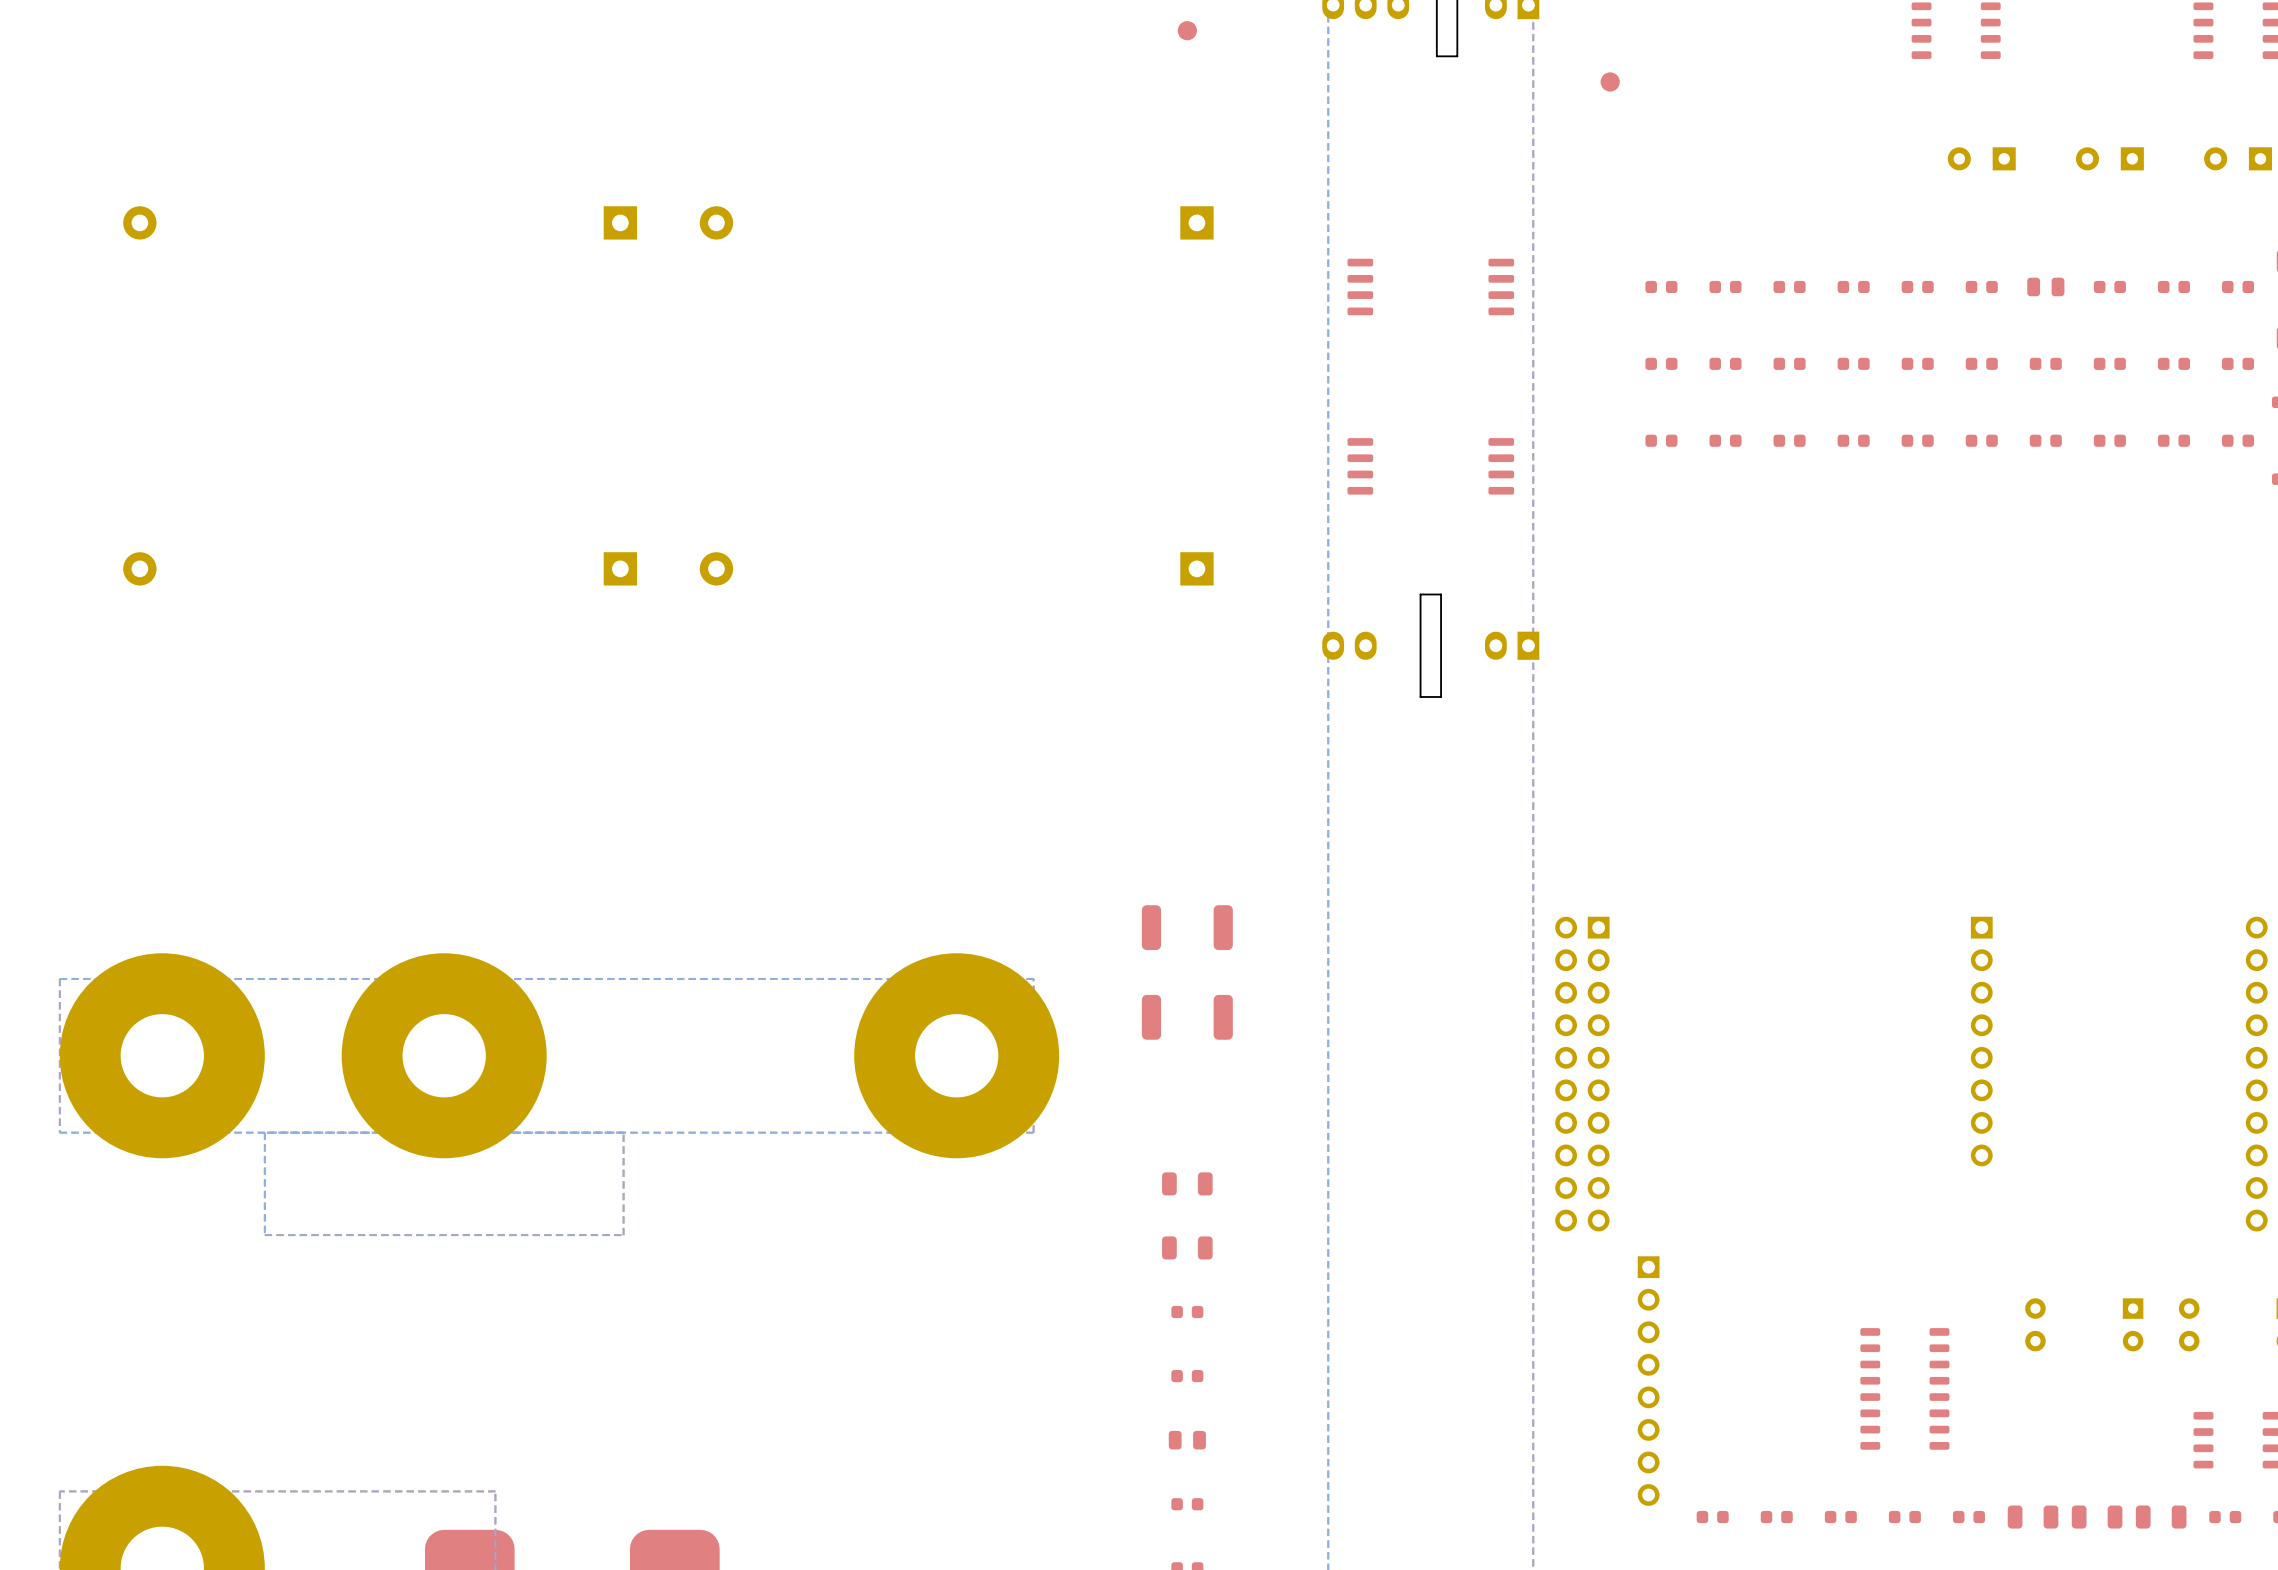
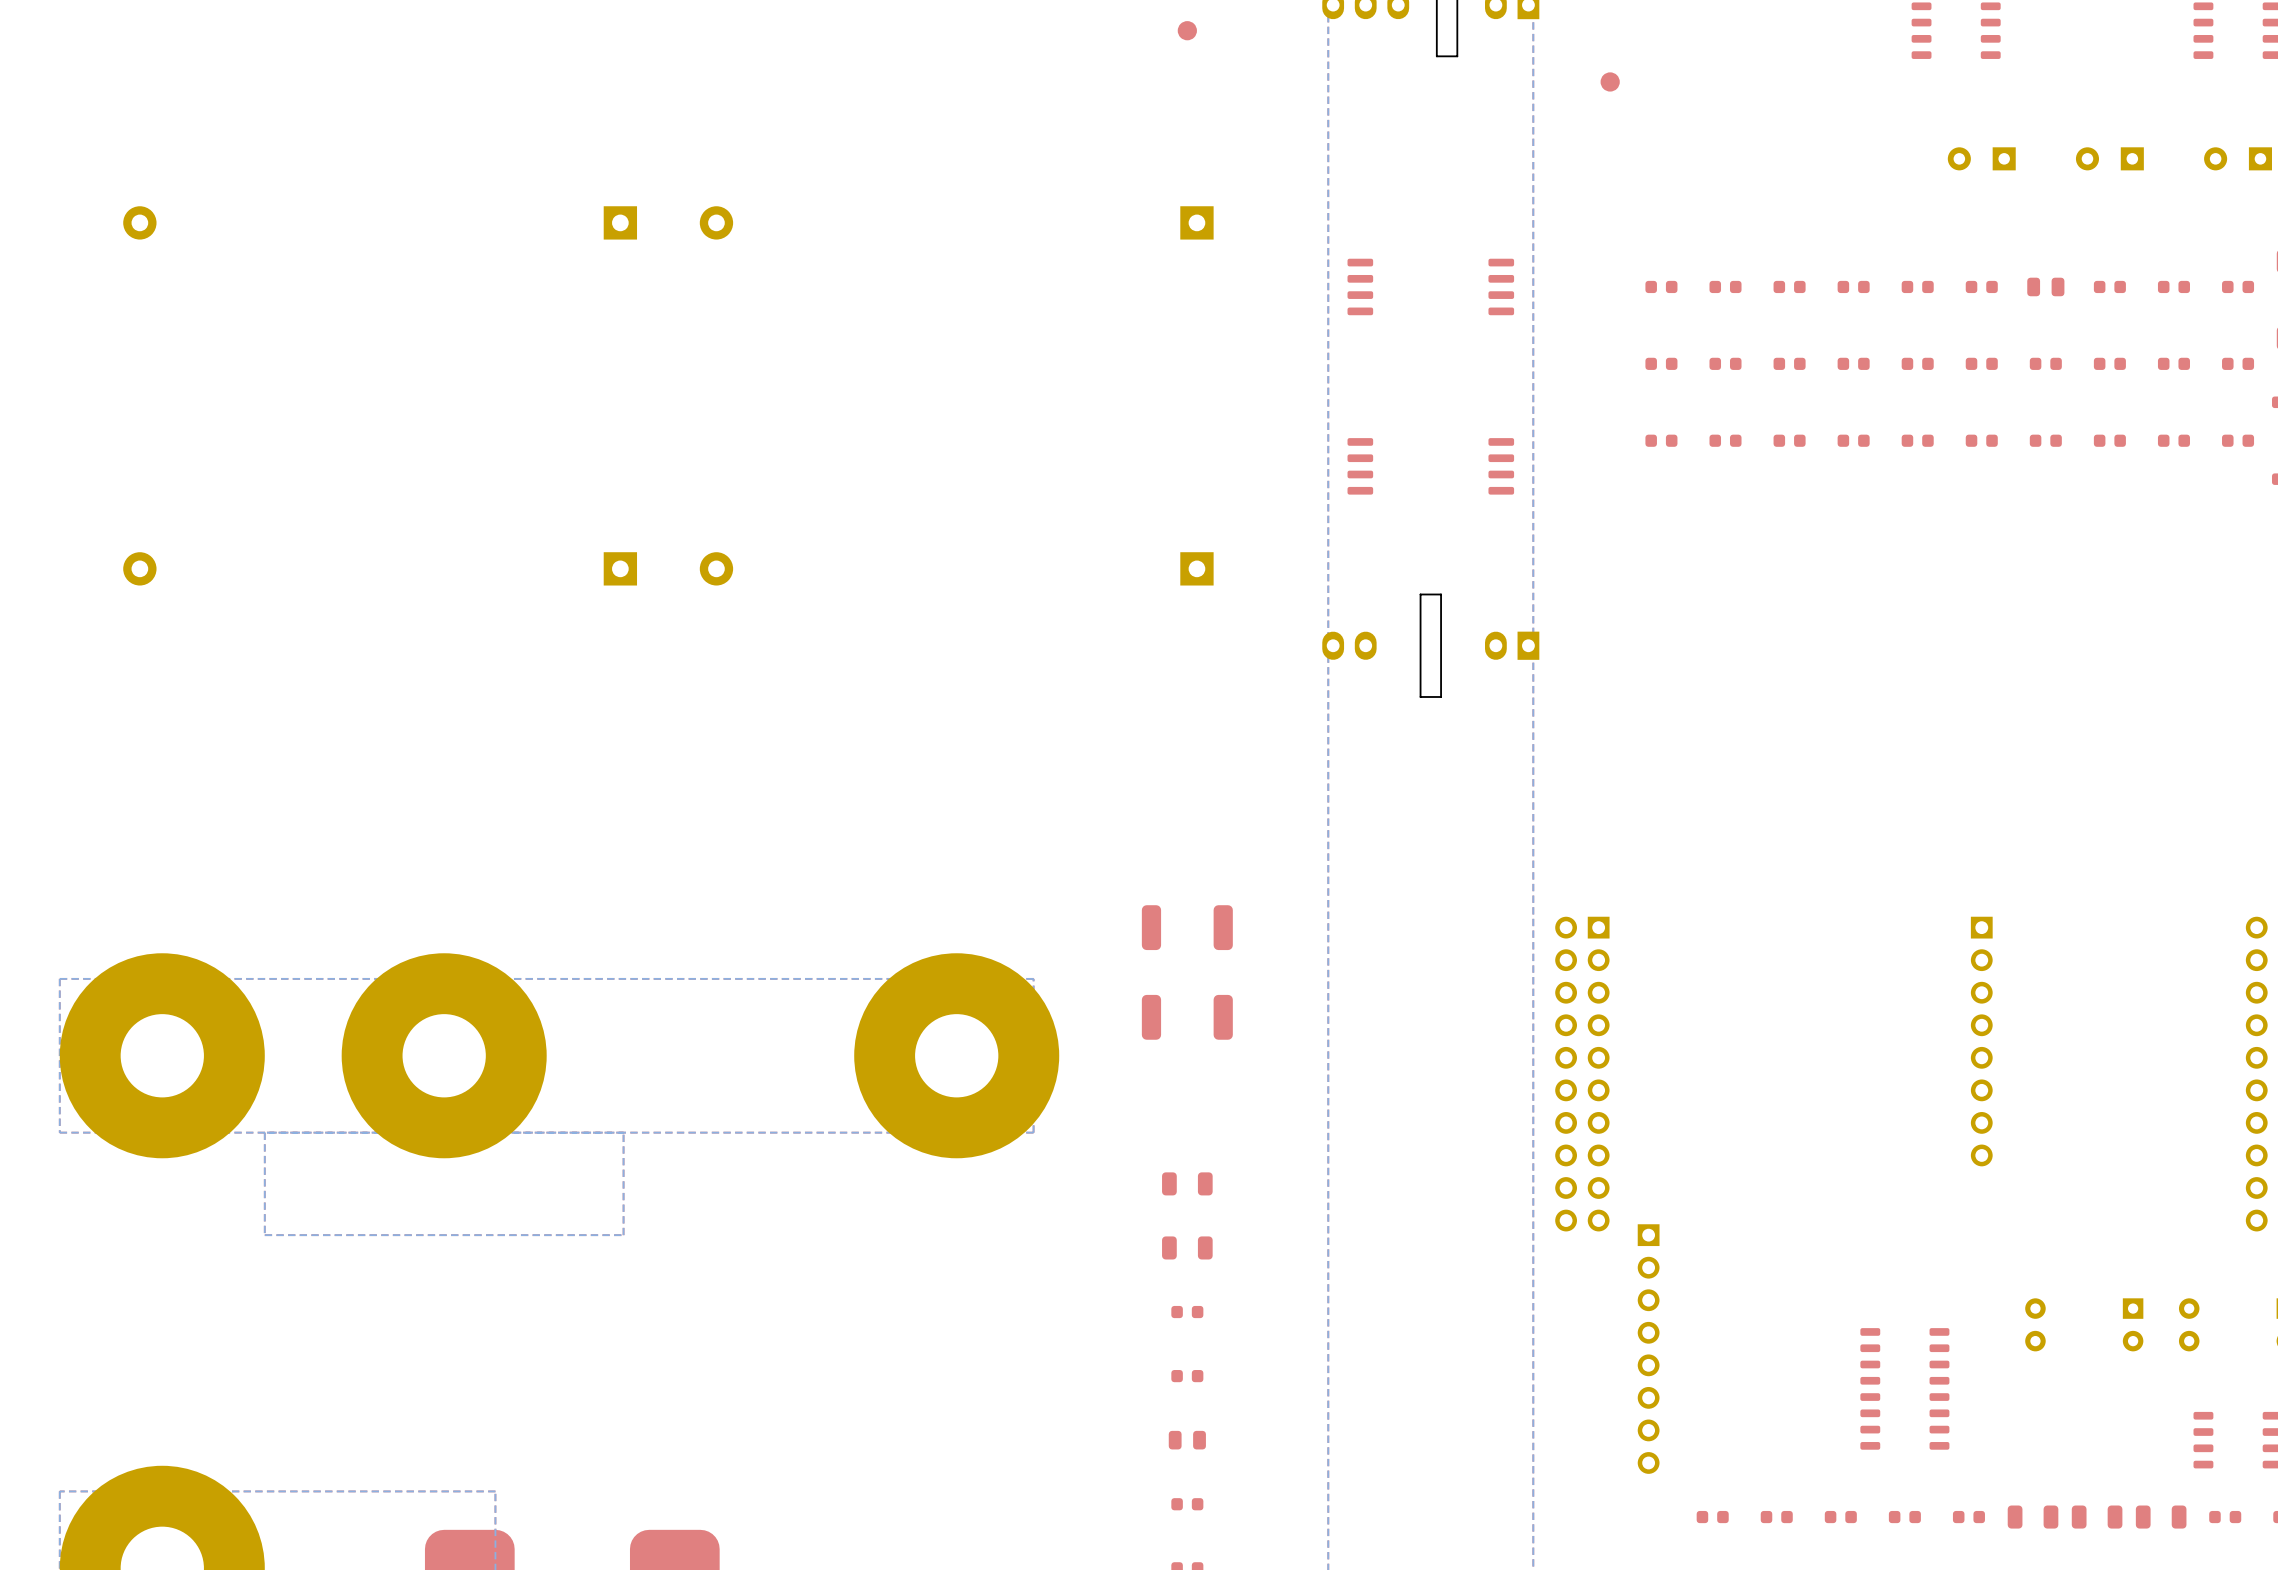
part position: (1648, 1381) -> (1648, 1349)

